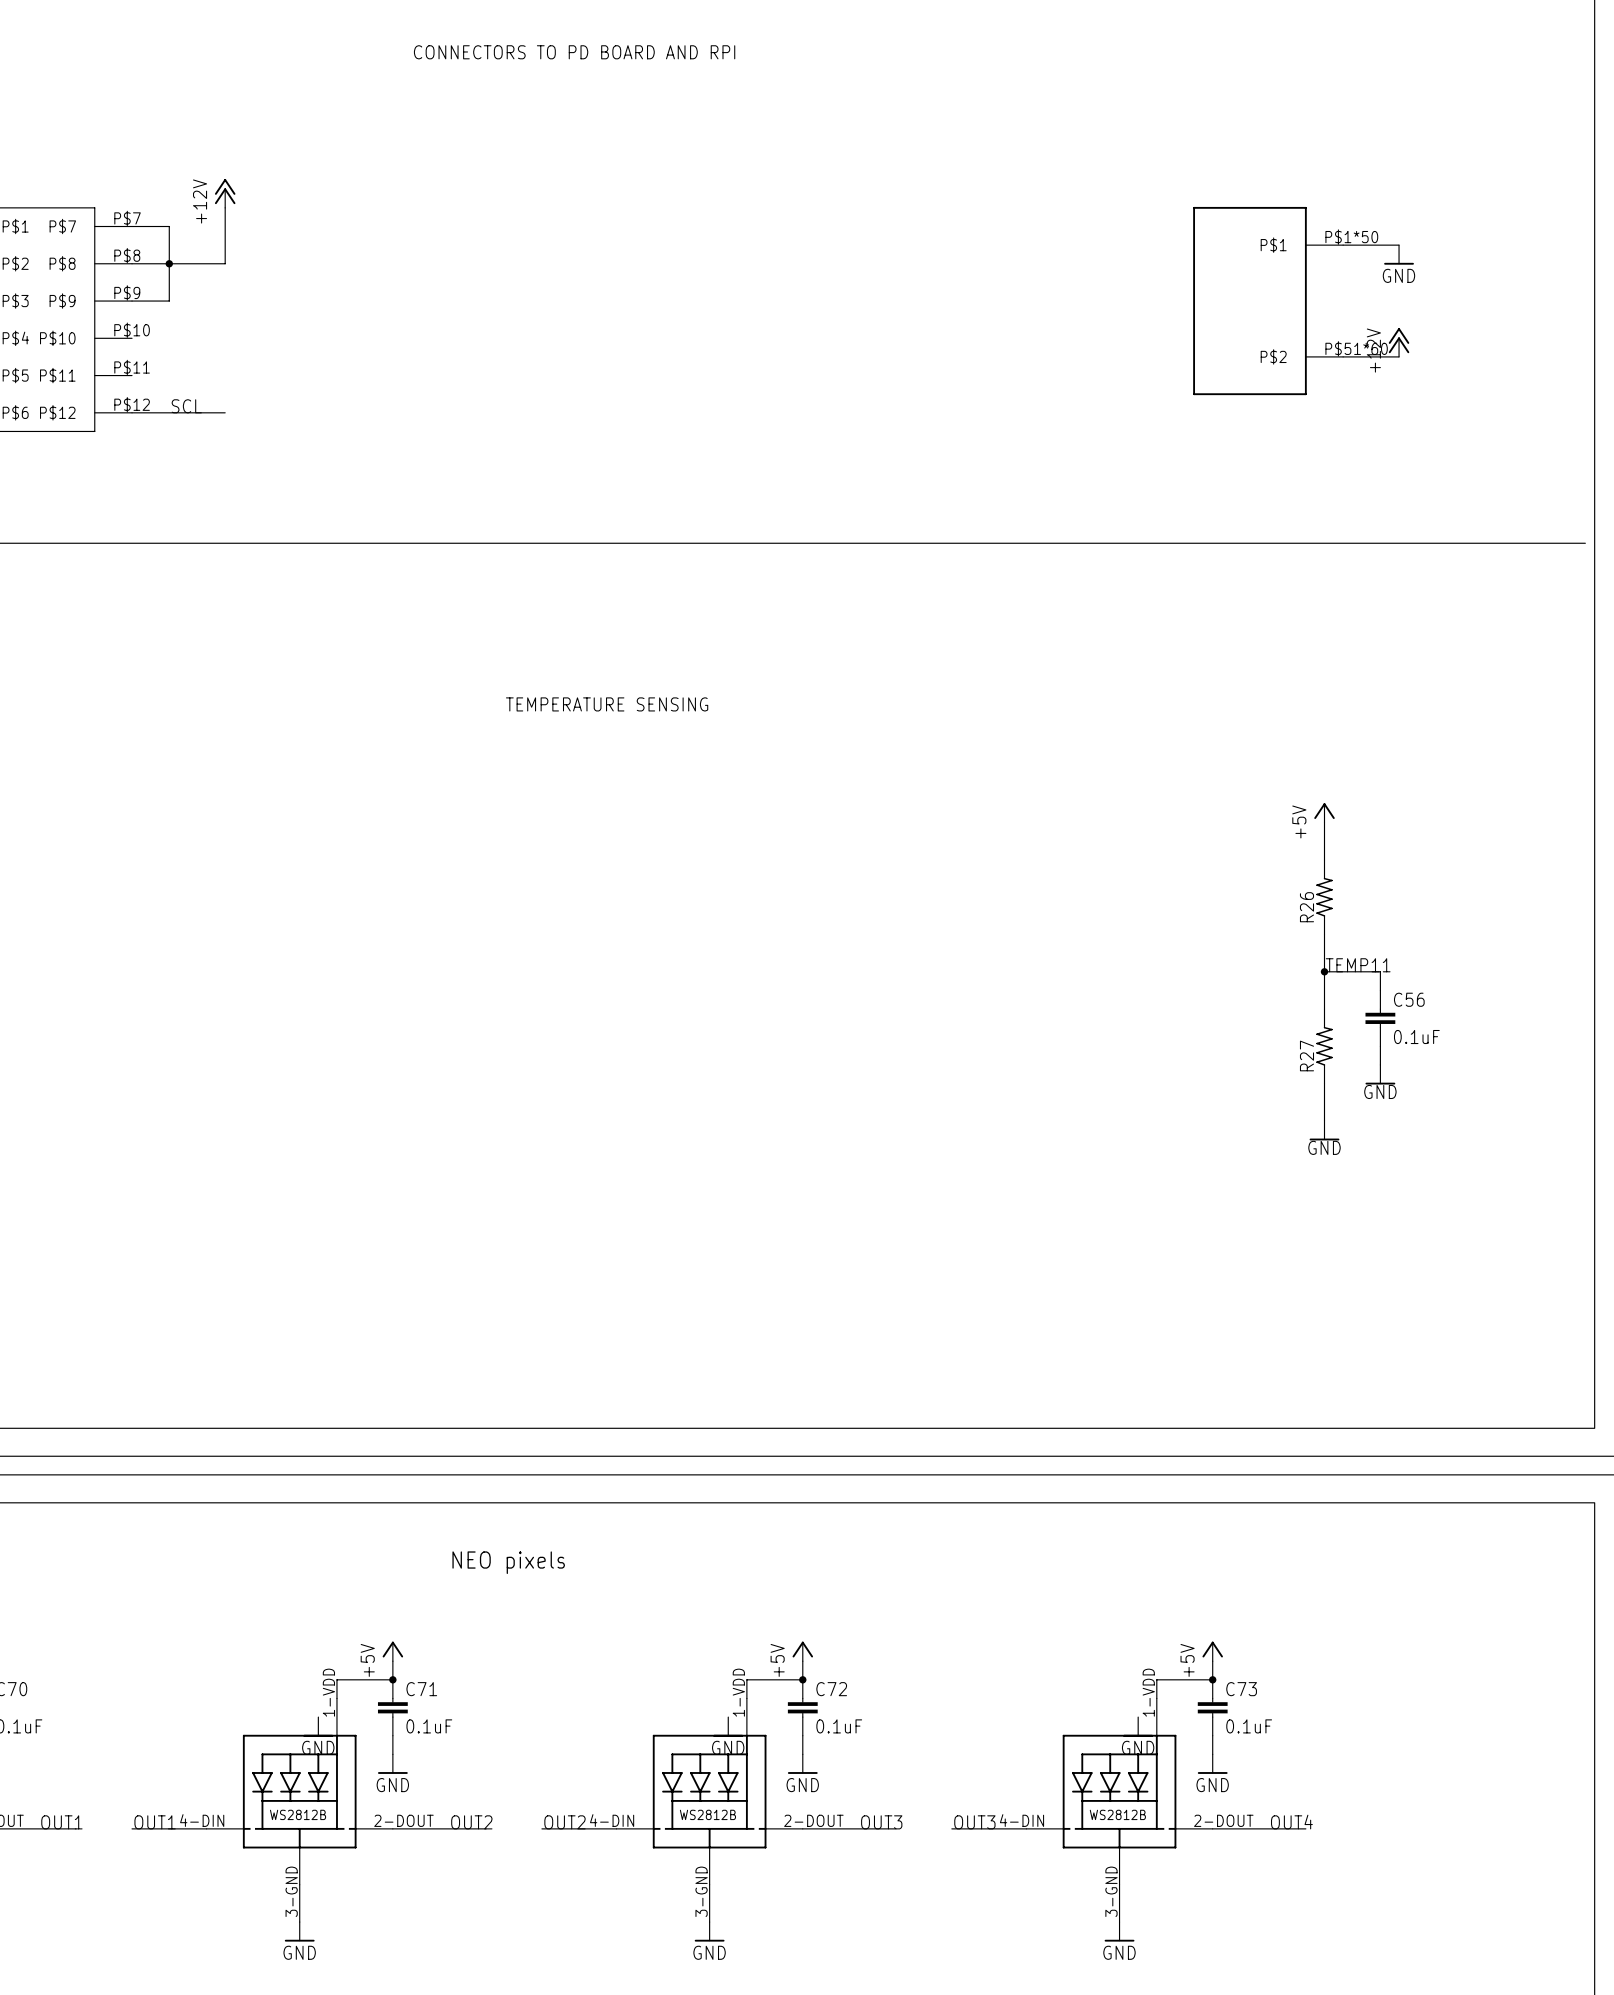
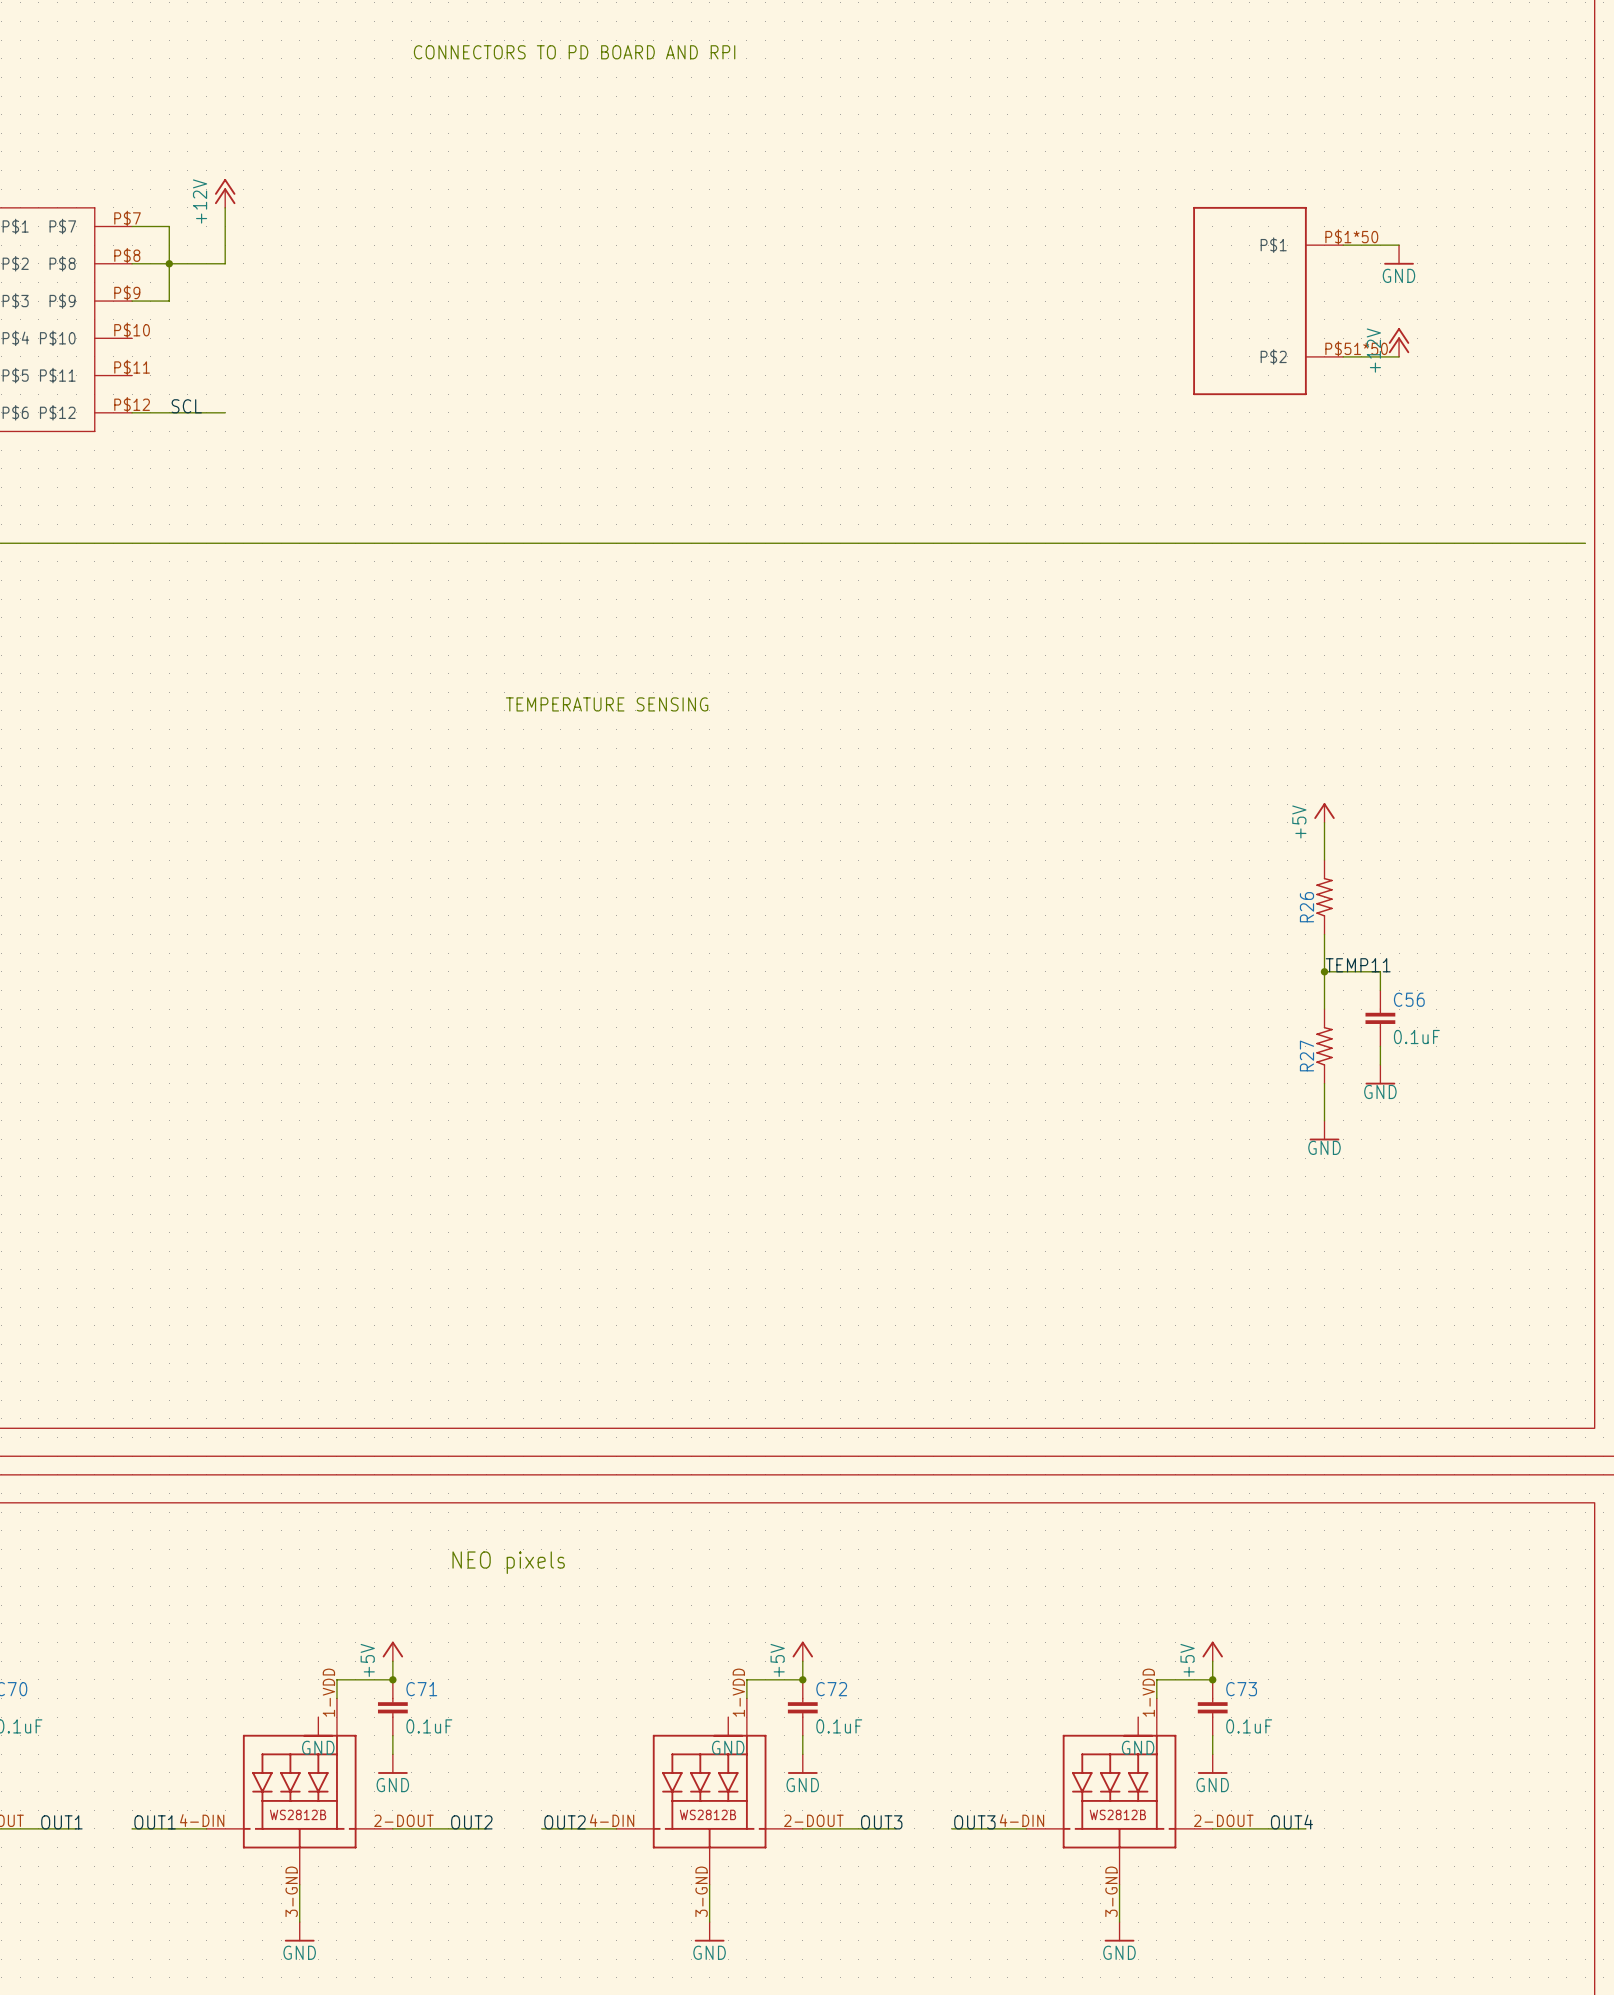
part pin number: P$51*60 (1356, 348) -> P$51*50 (1356, 348)

